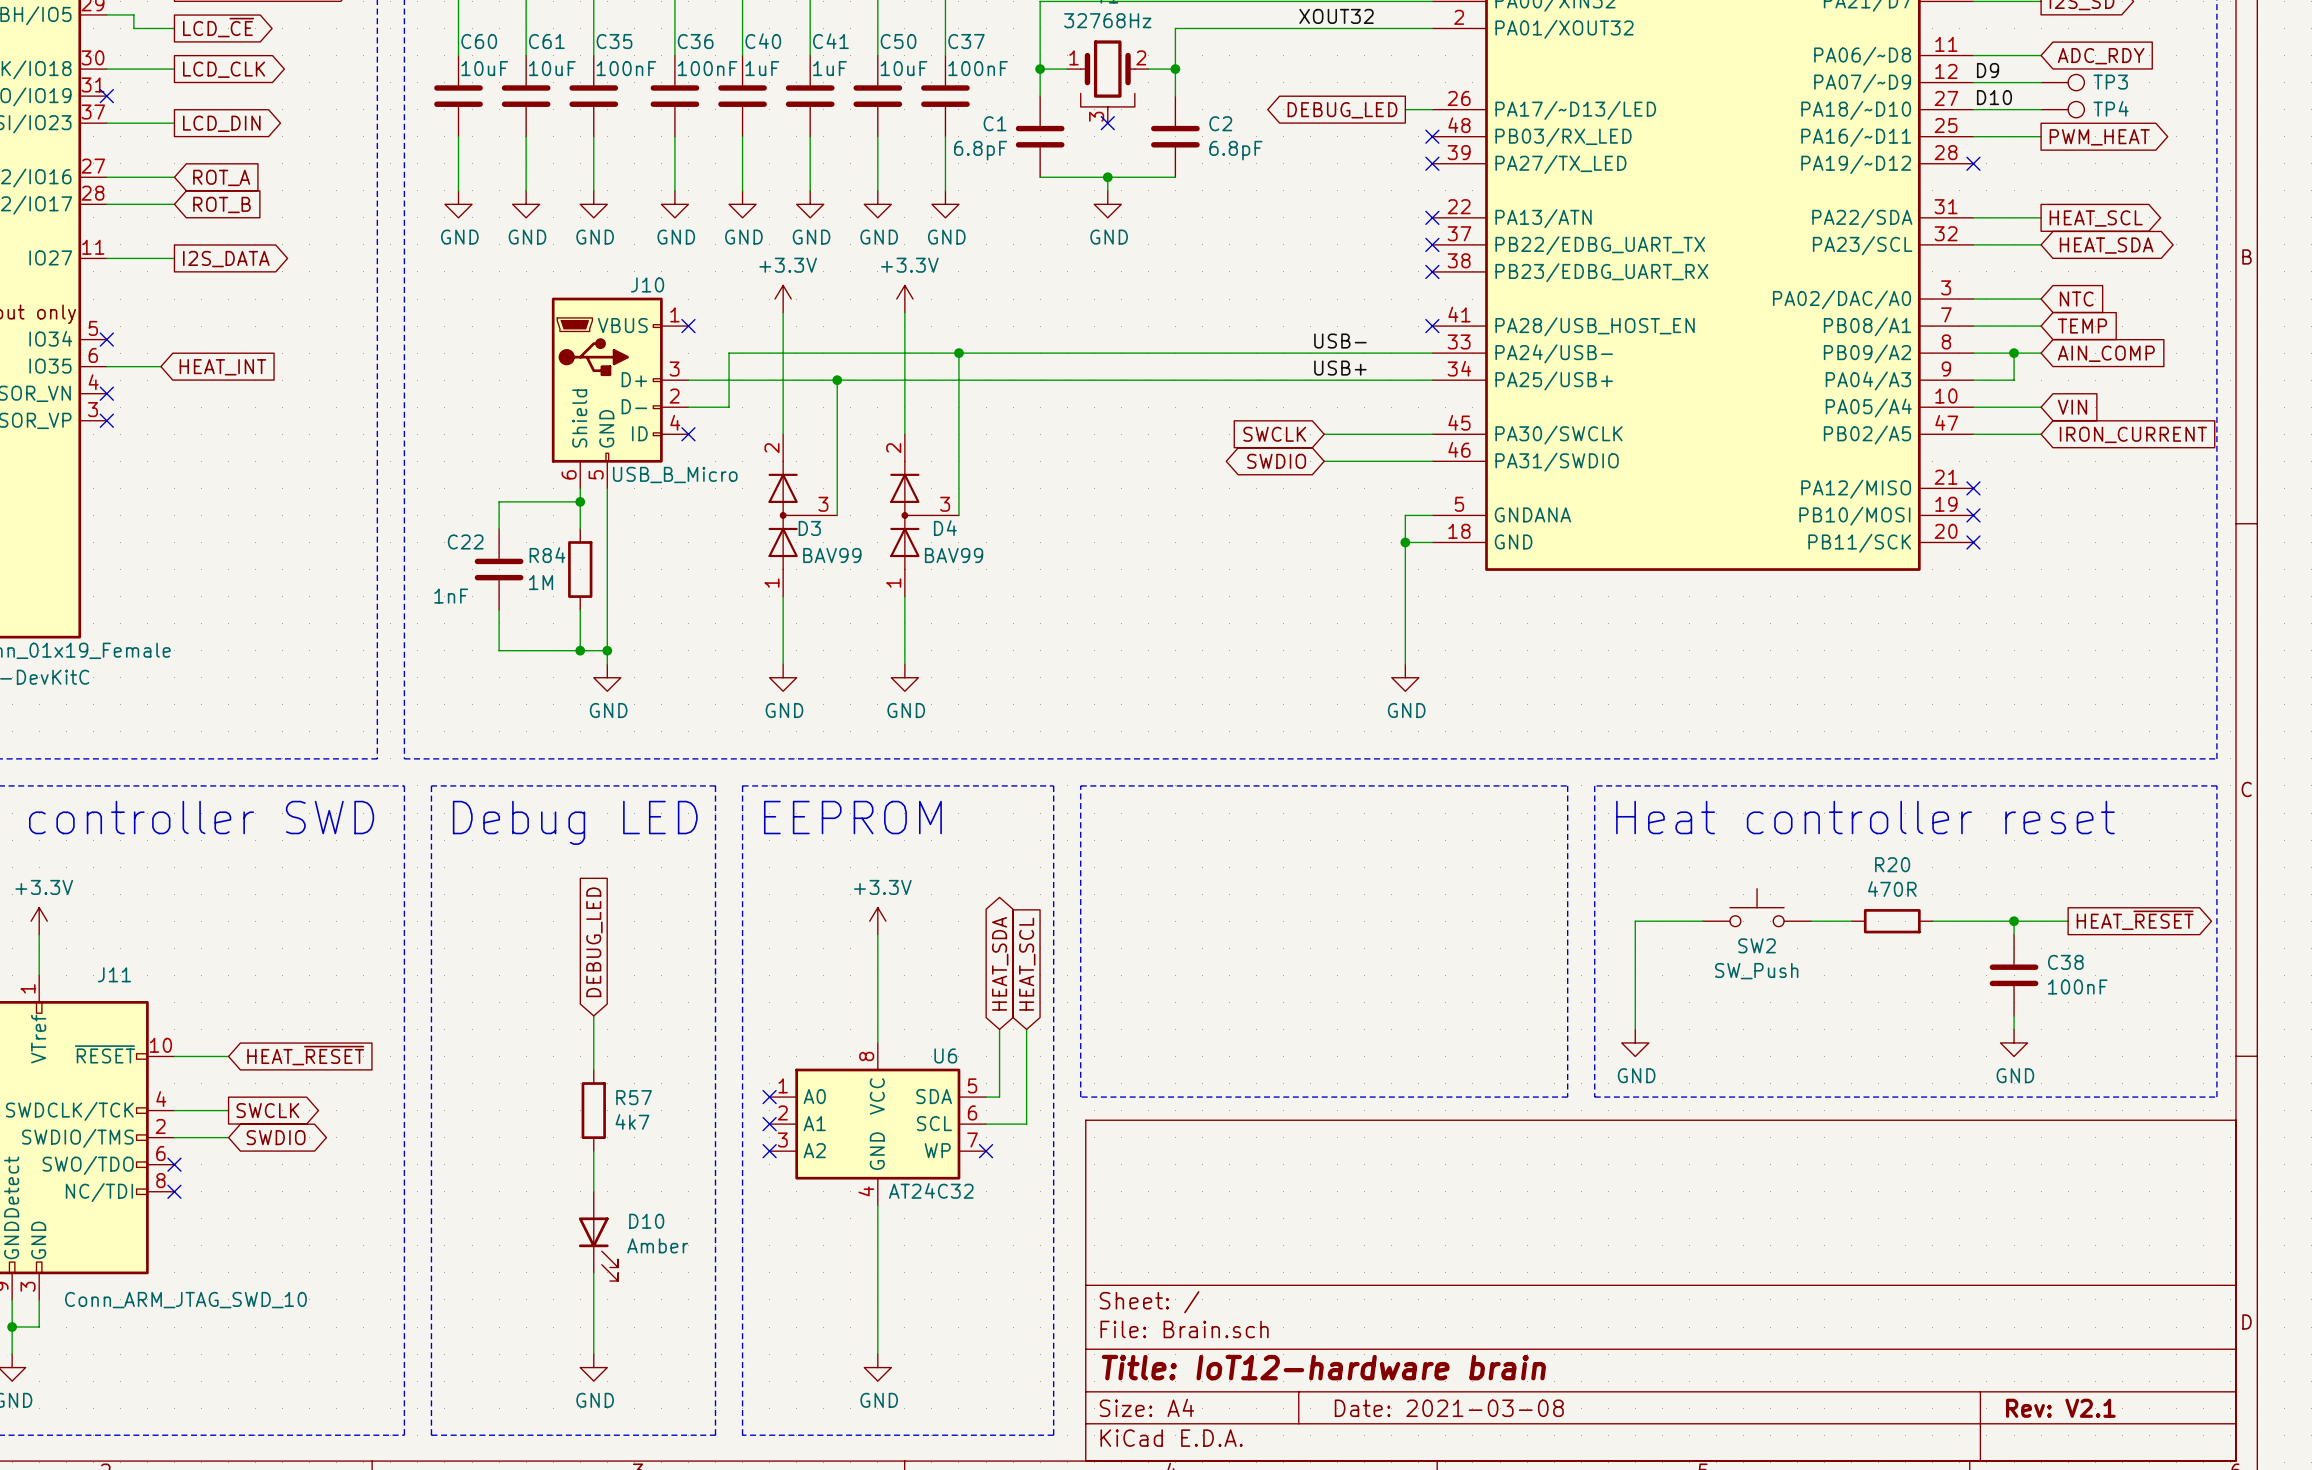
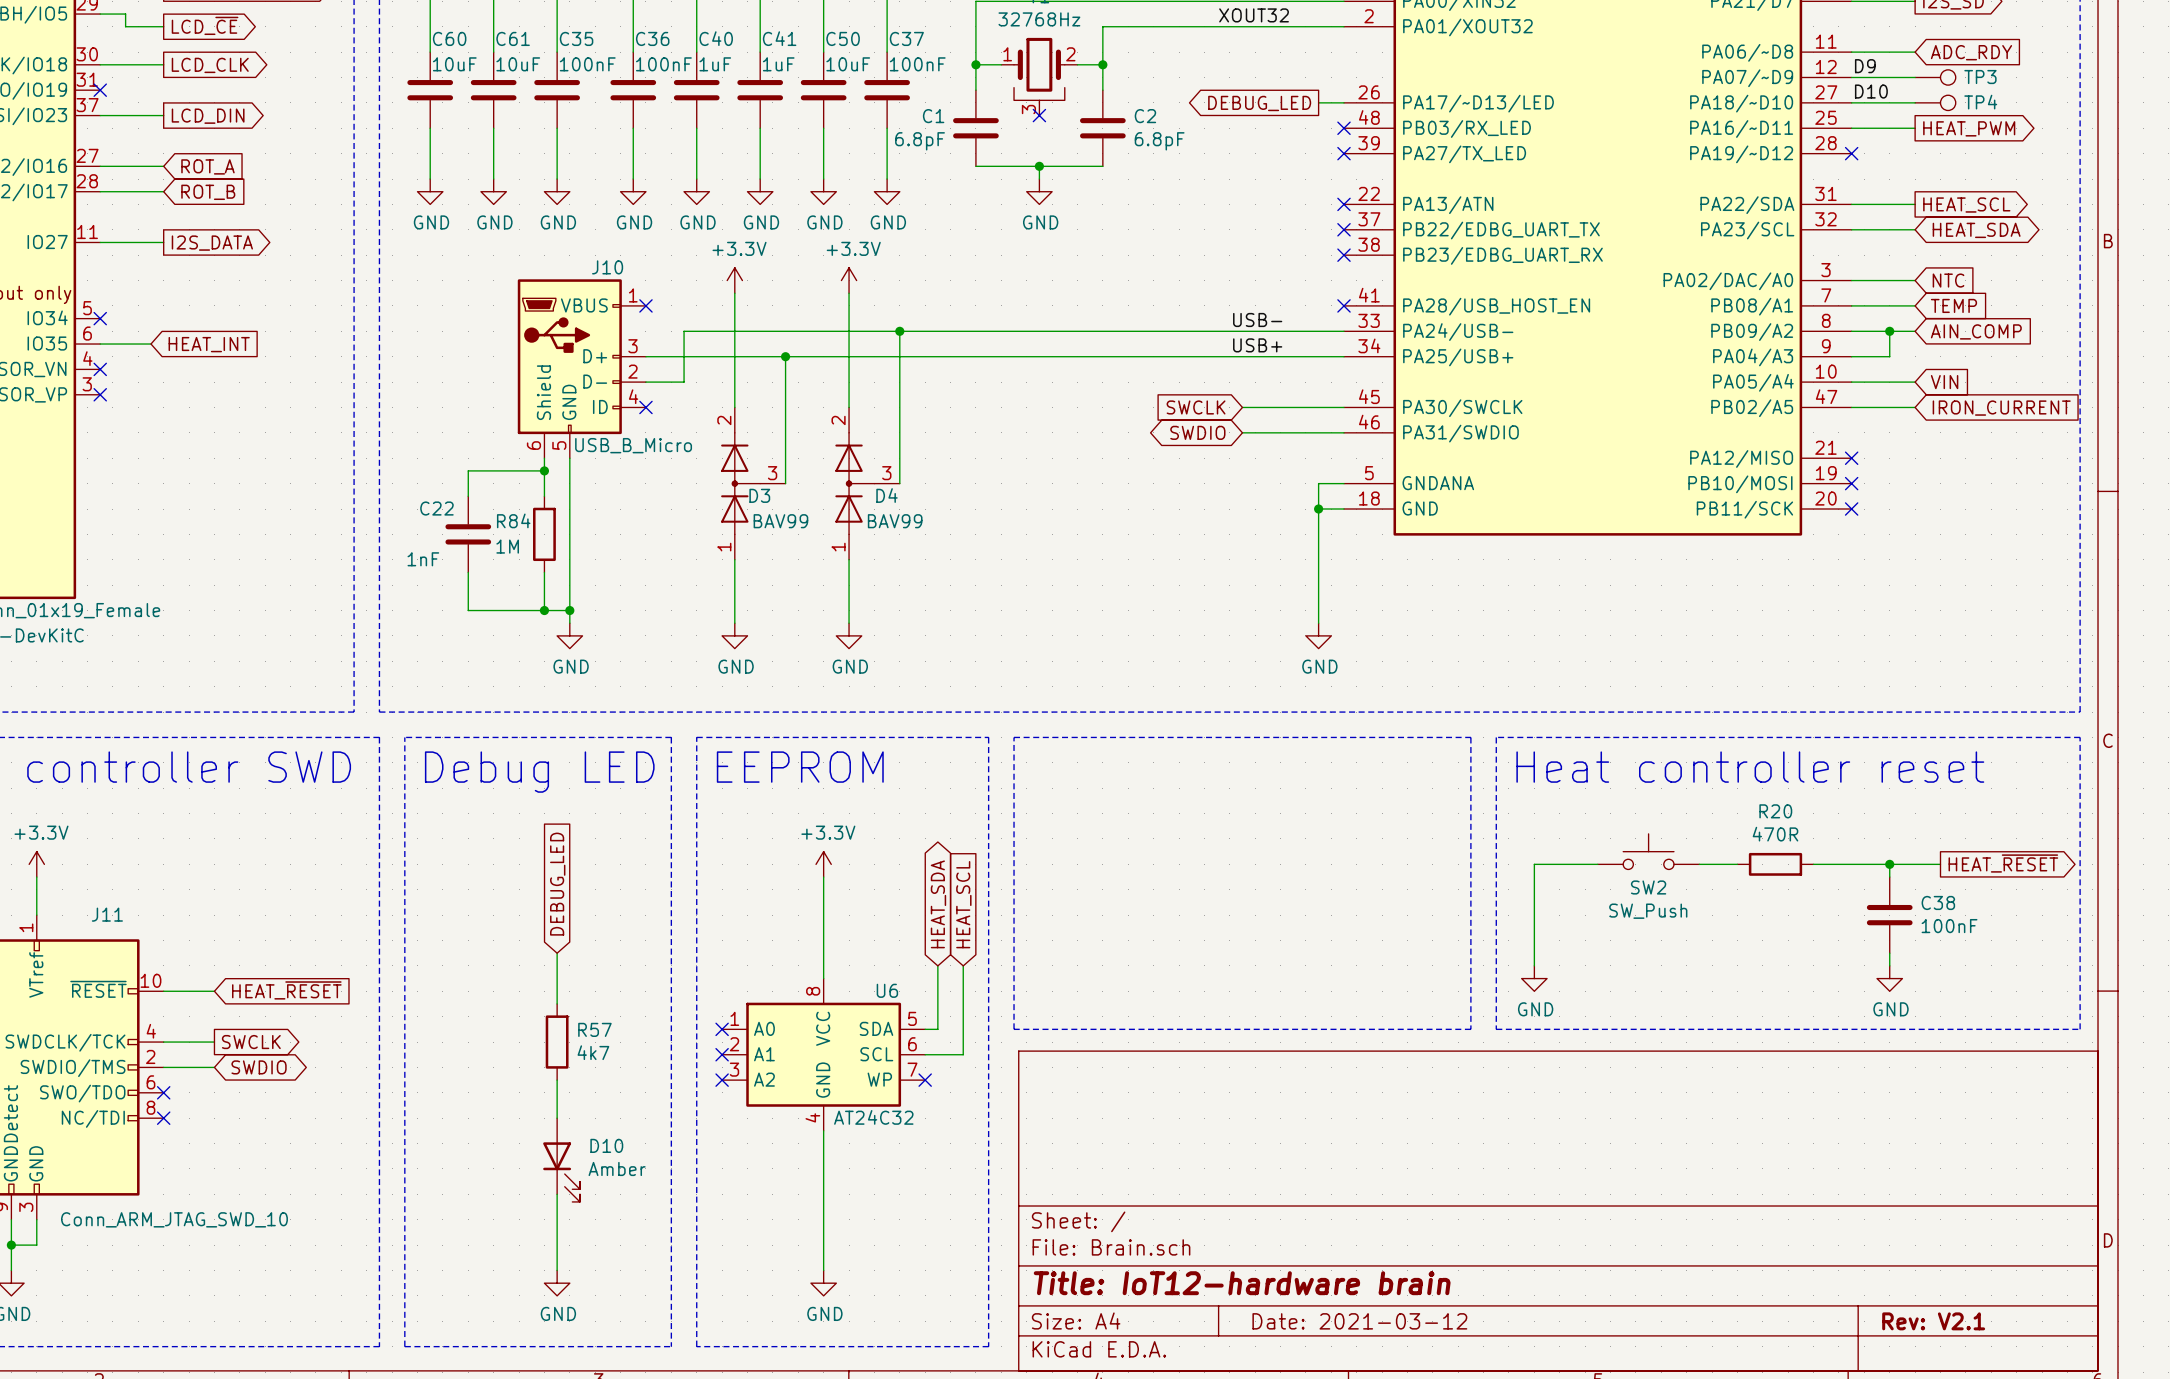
global label: PWM_HEAT (2099, 137) -> HEAT_PWM (1969, 128)
title block: Date: 2021-03-08 (1449, 1408) -> Date: 2021-03-12 (1359, 1321)

